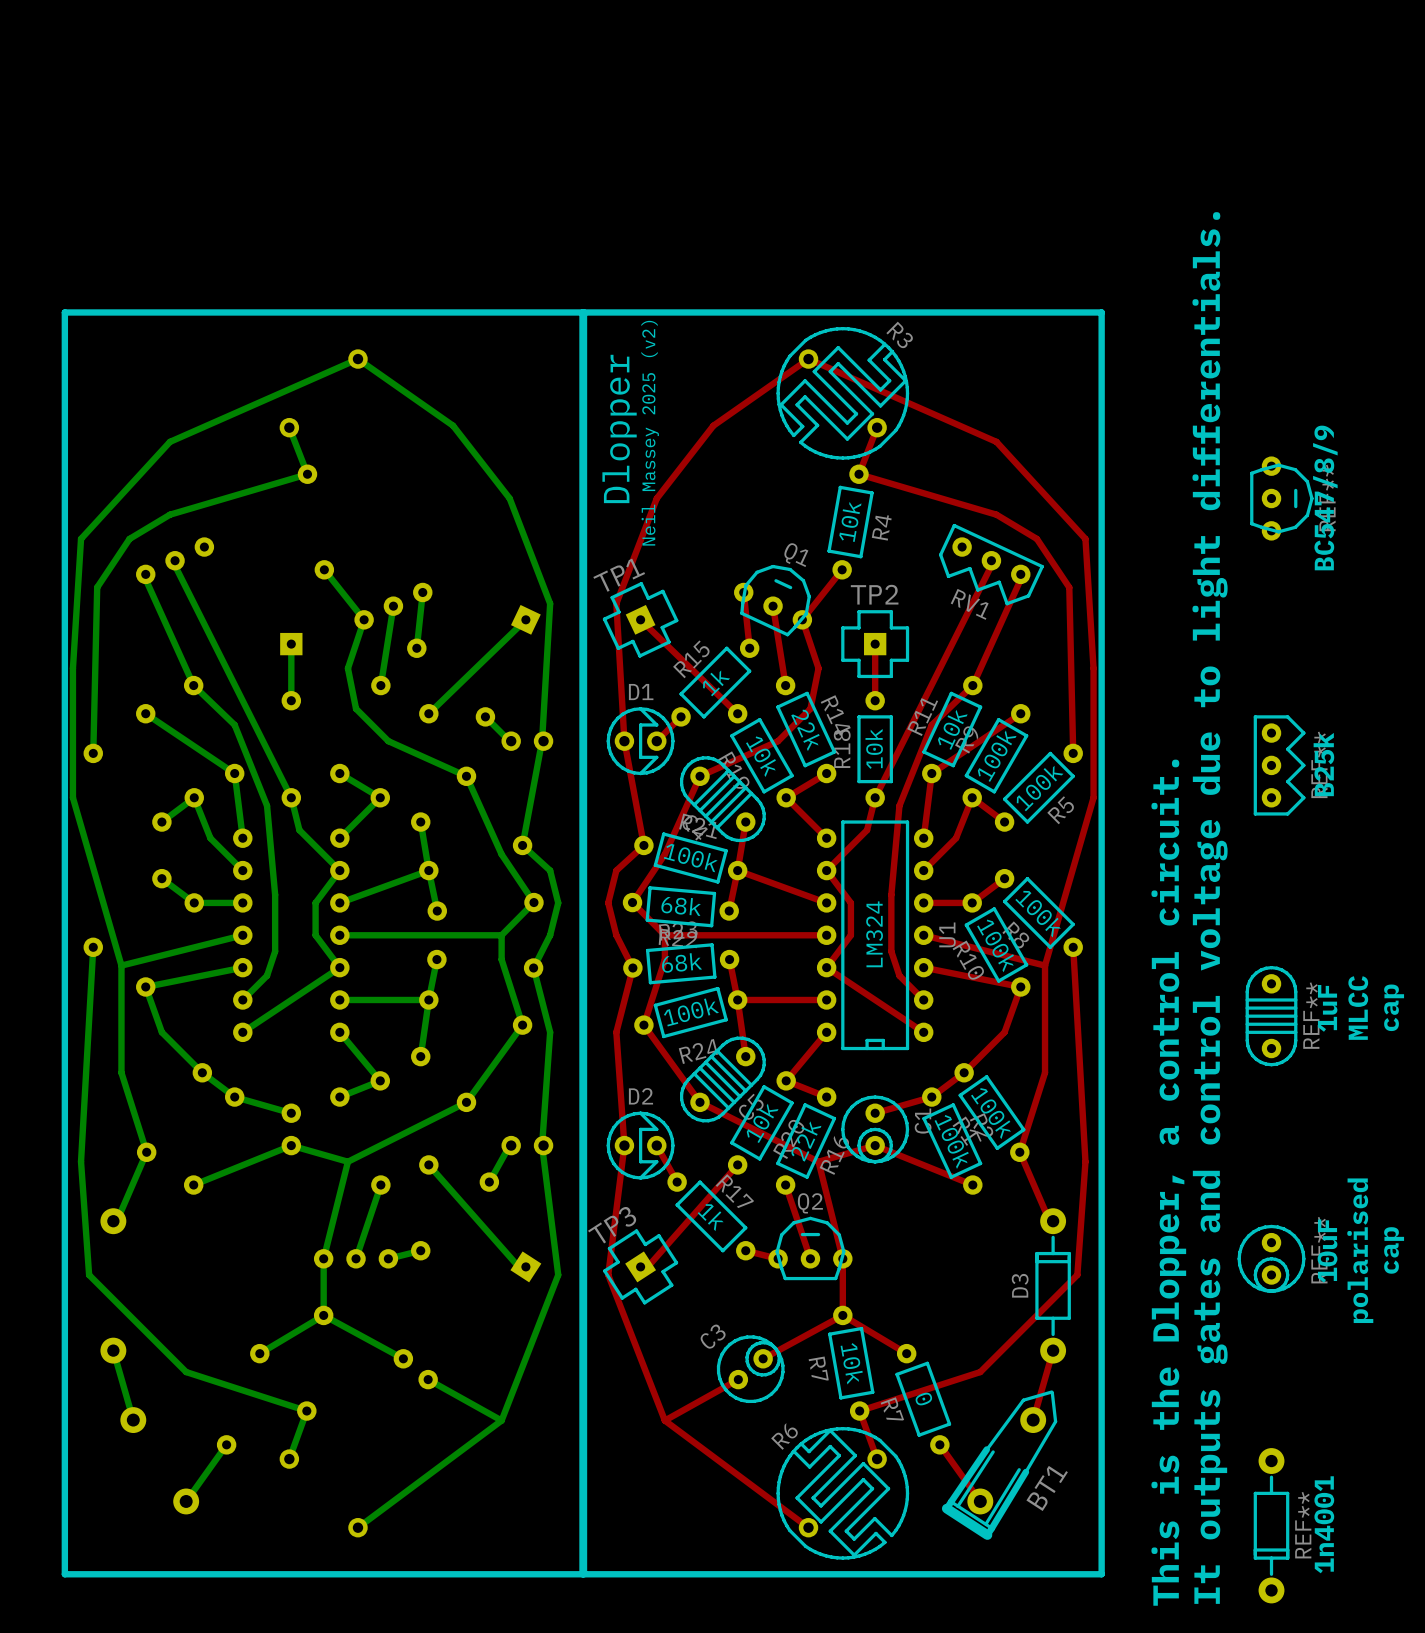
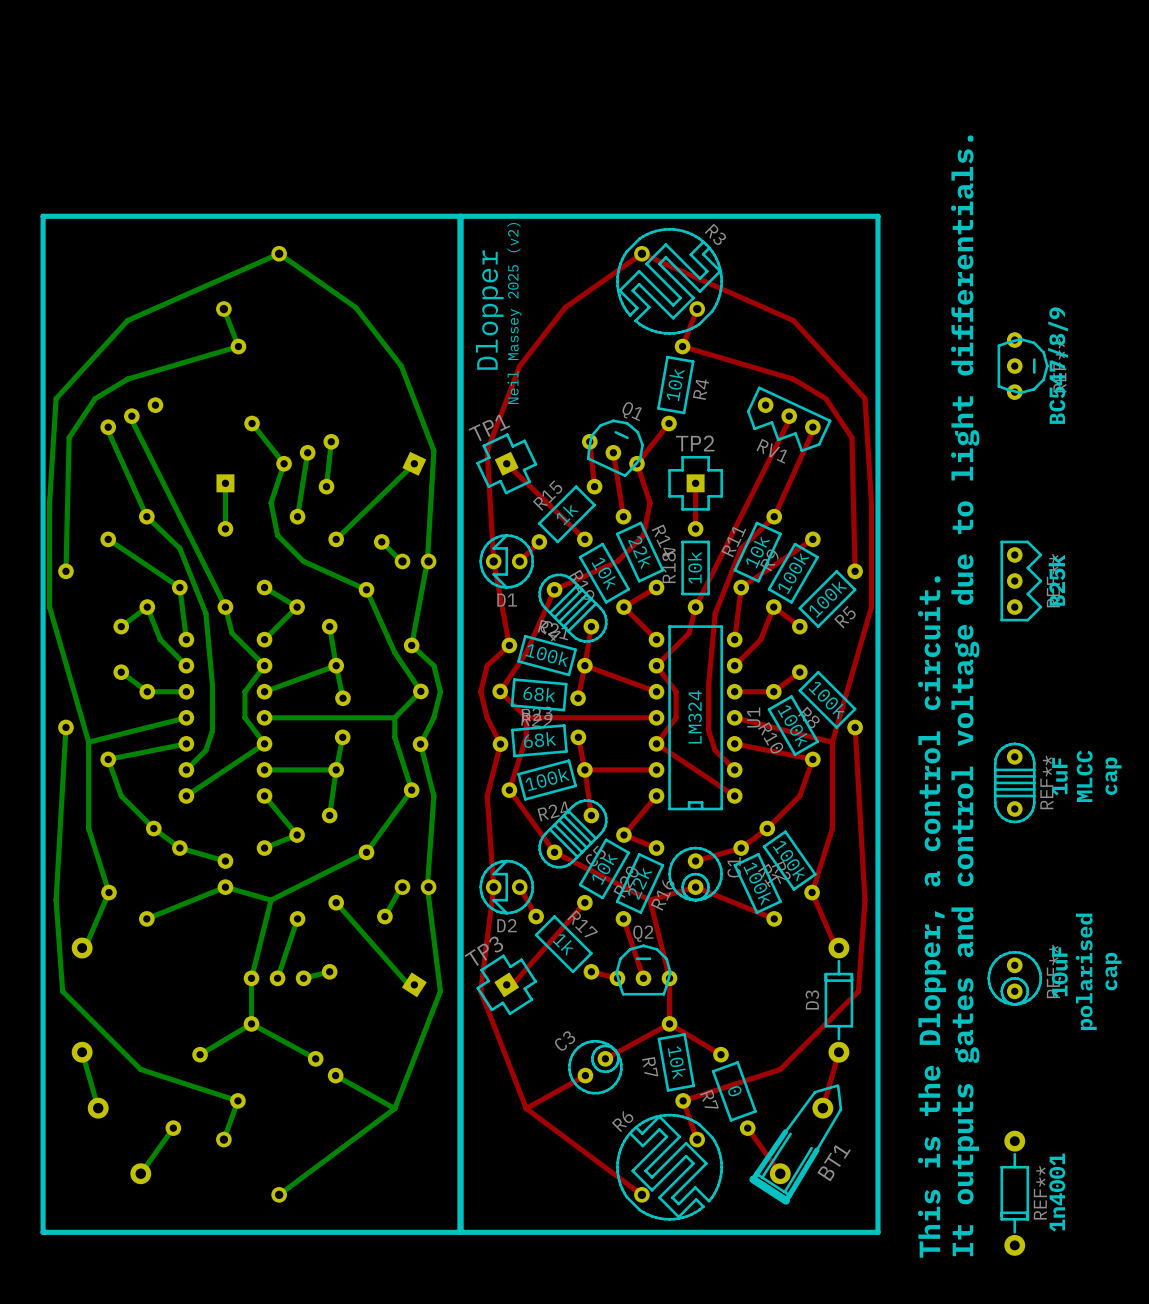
D1 rotation: 0° (640, 741) -> 180° (506, 561)
D2 rotation: 0° (640, 1145) -> 180° (506, 887)

